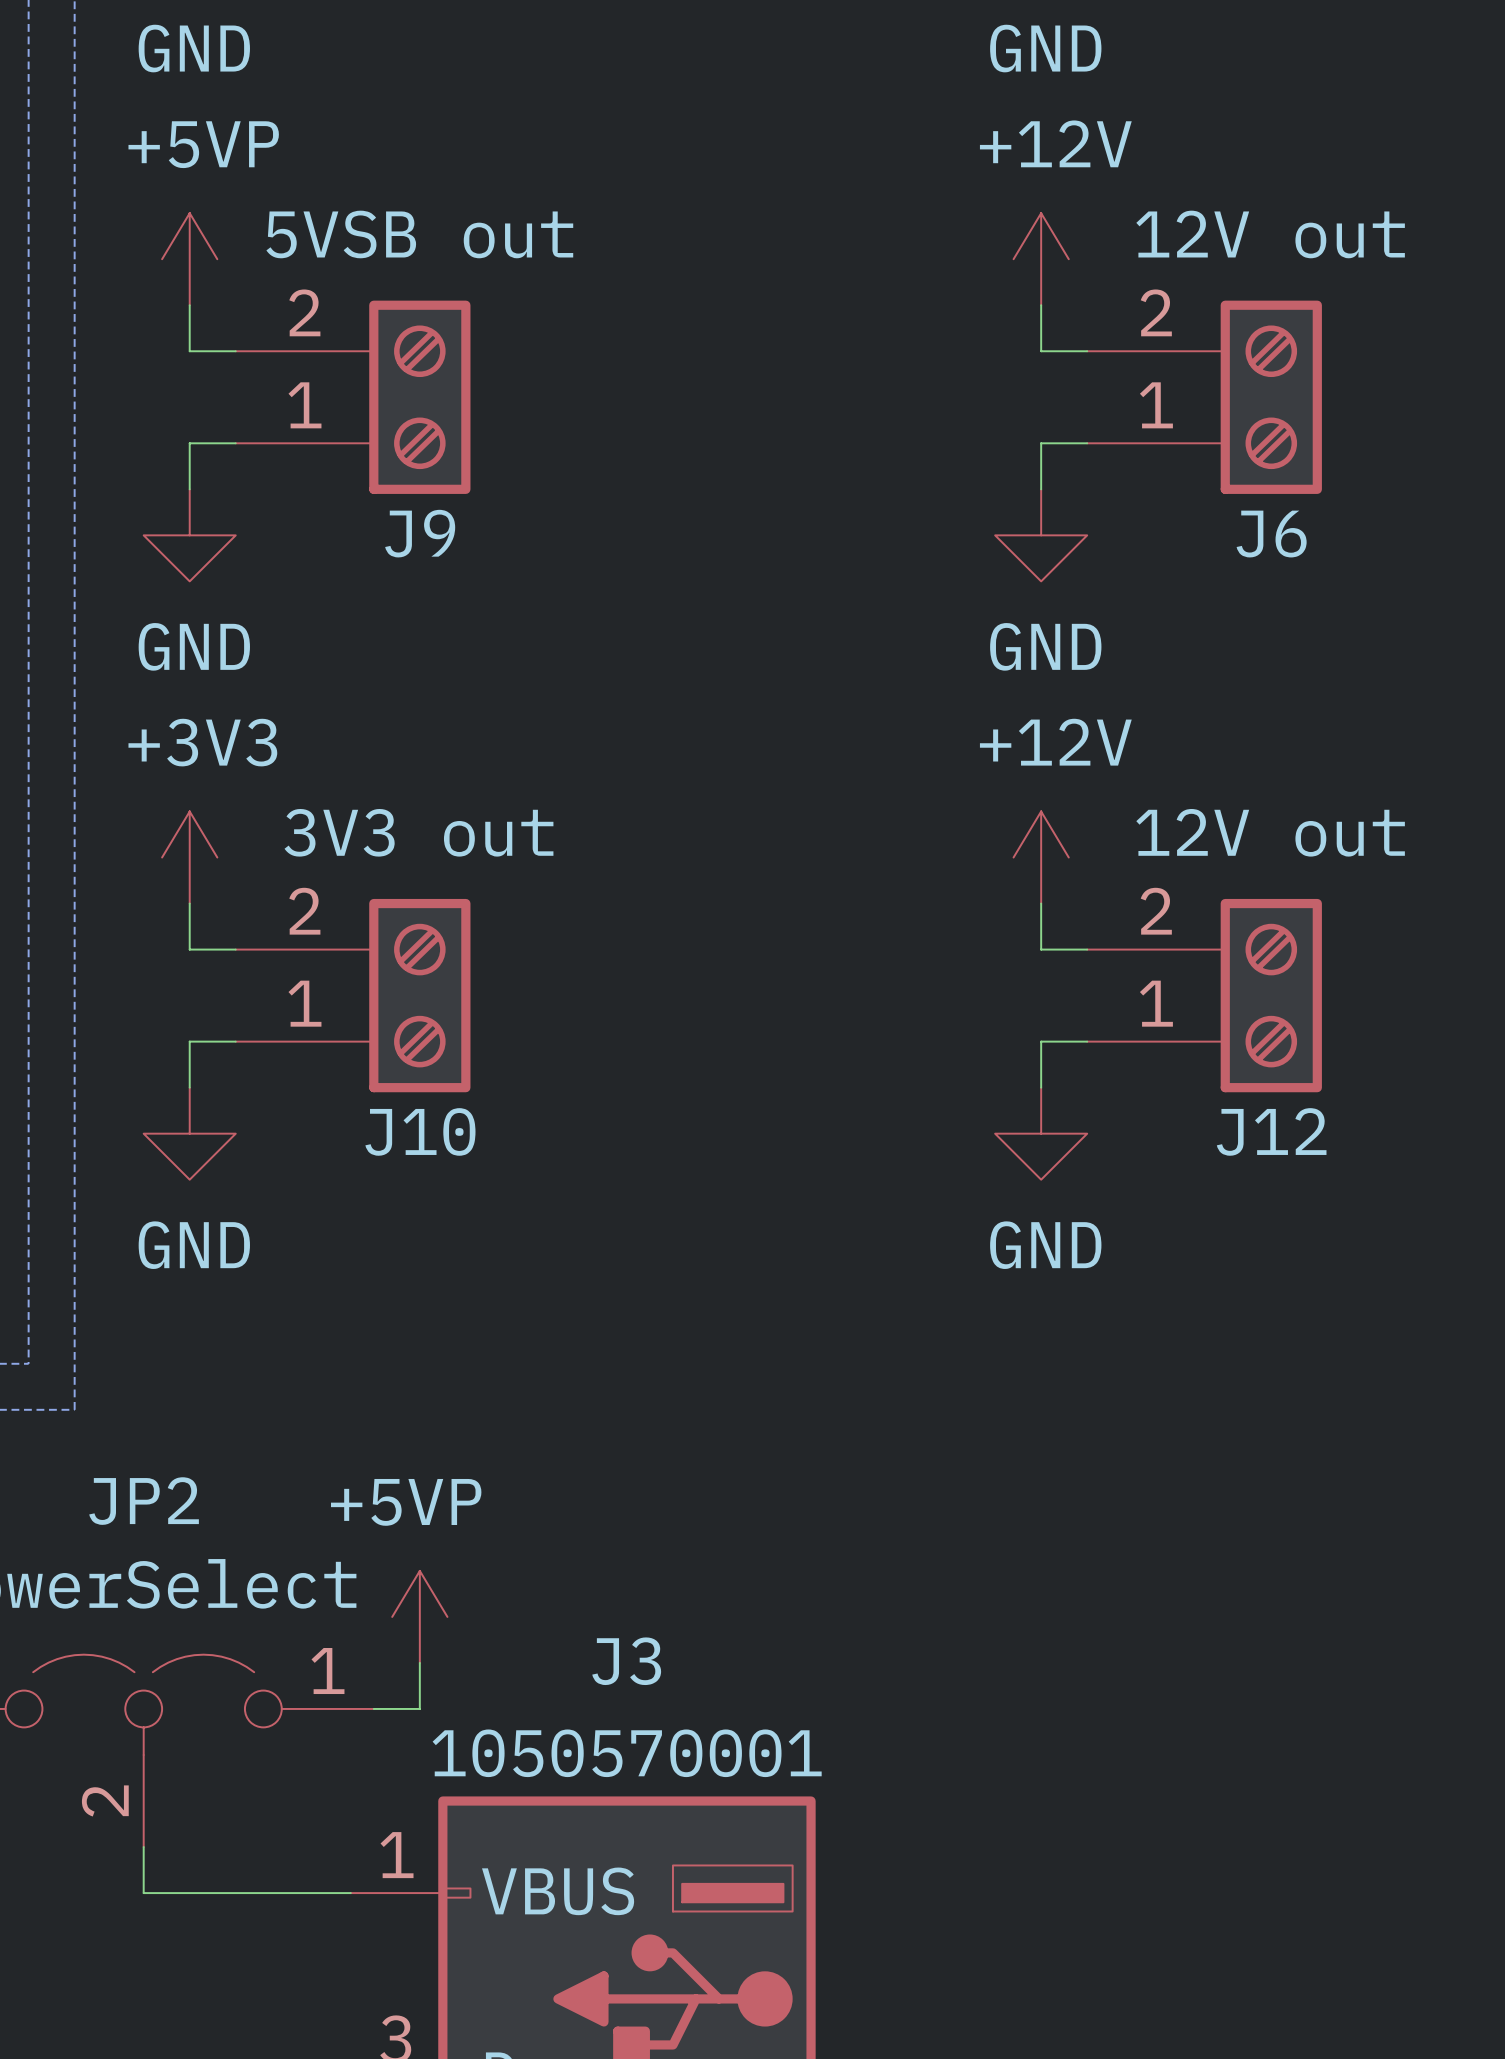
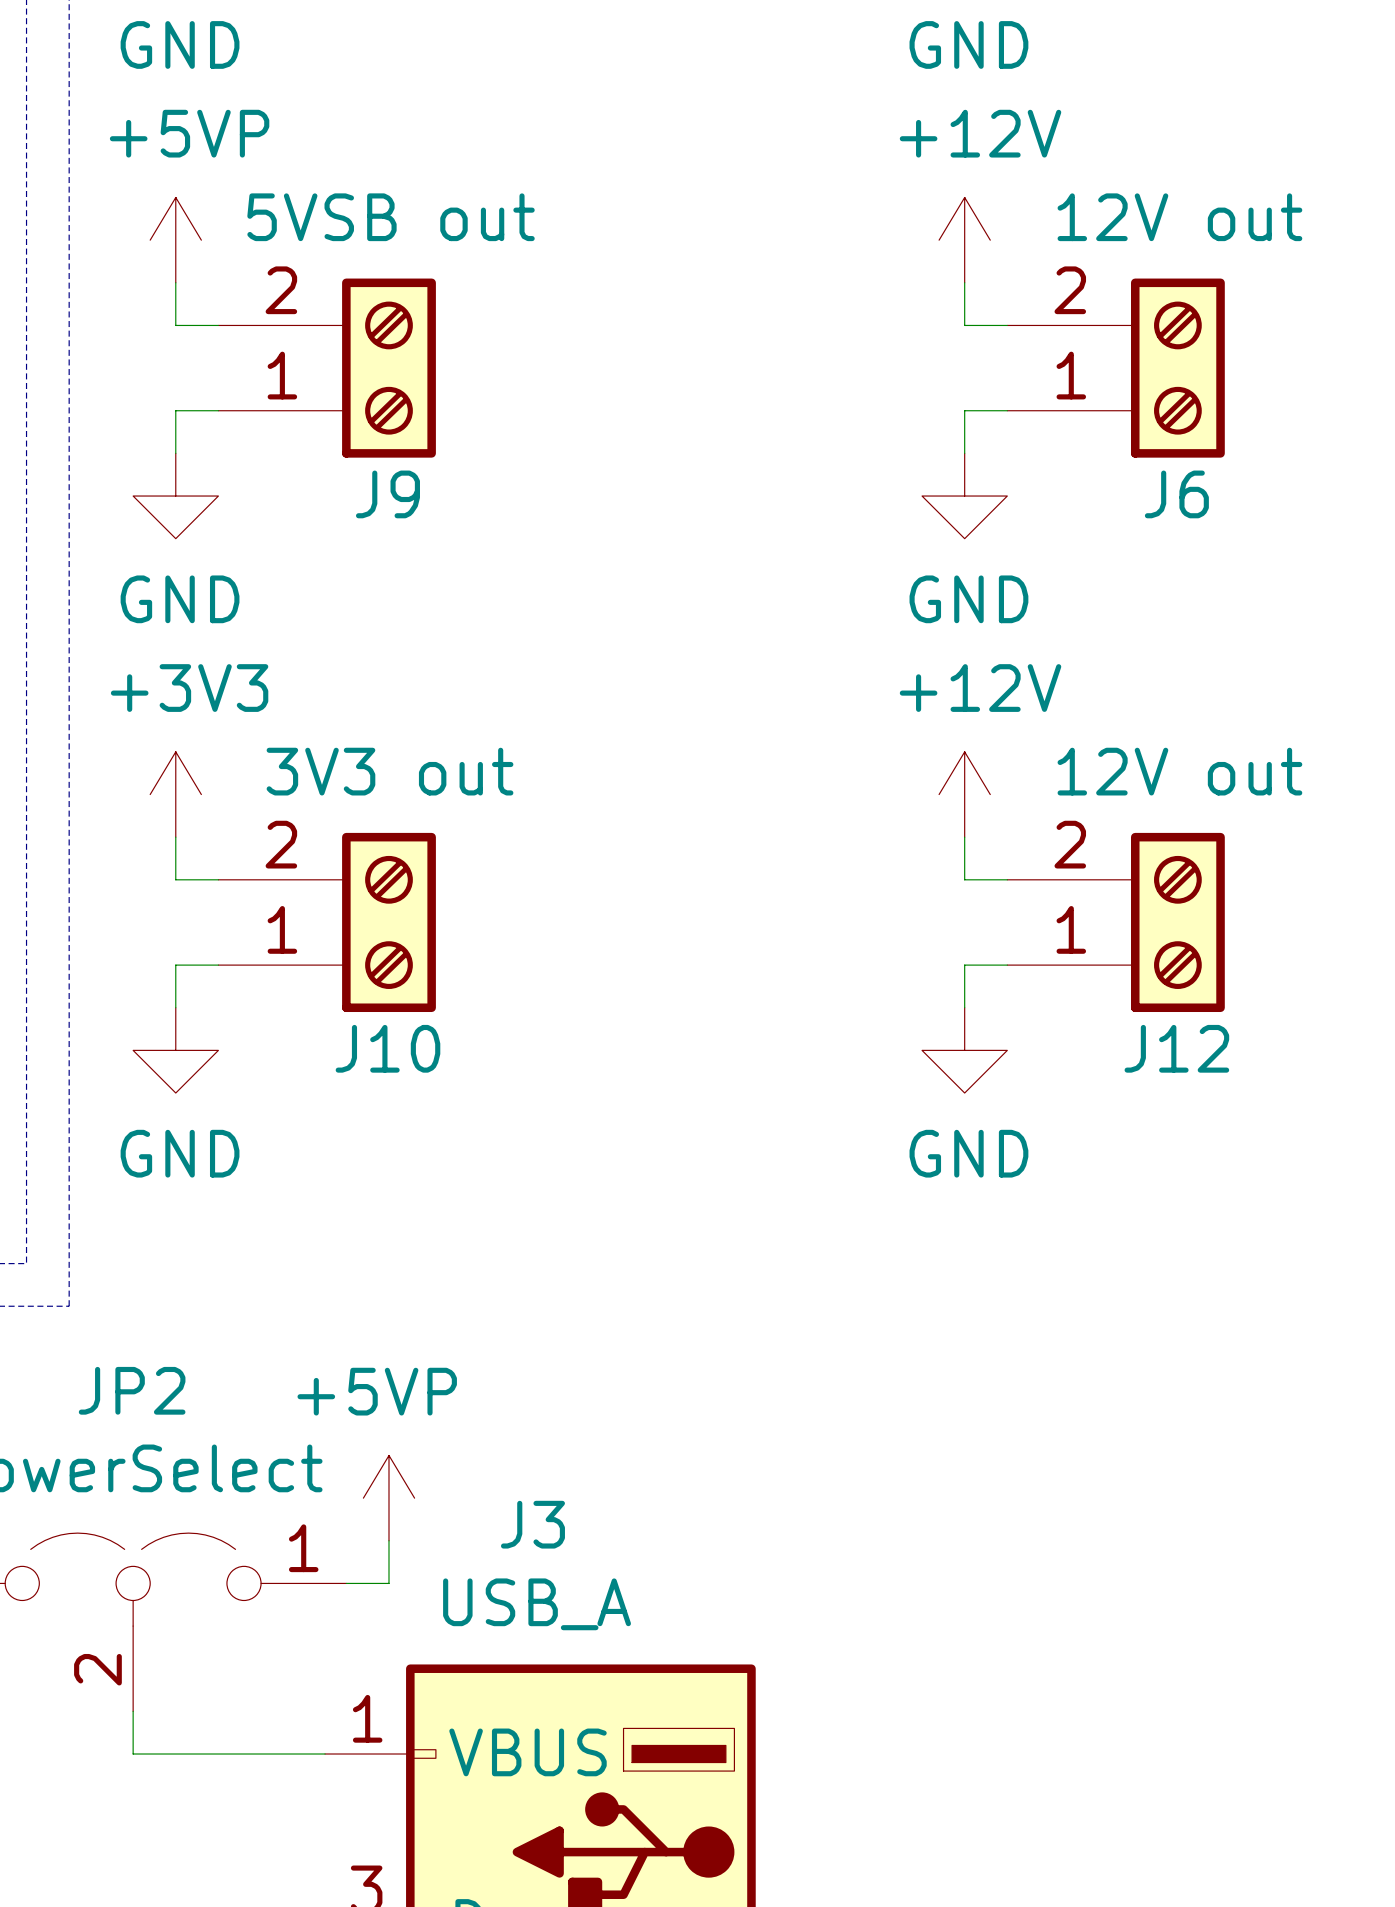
J3 name position: J3 (626, 1661) -> J3 (532, 1524)
J3 value: 1050570001 (627, 1753) -> USB_A (537, 1604)

